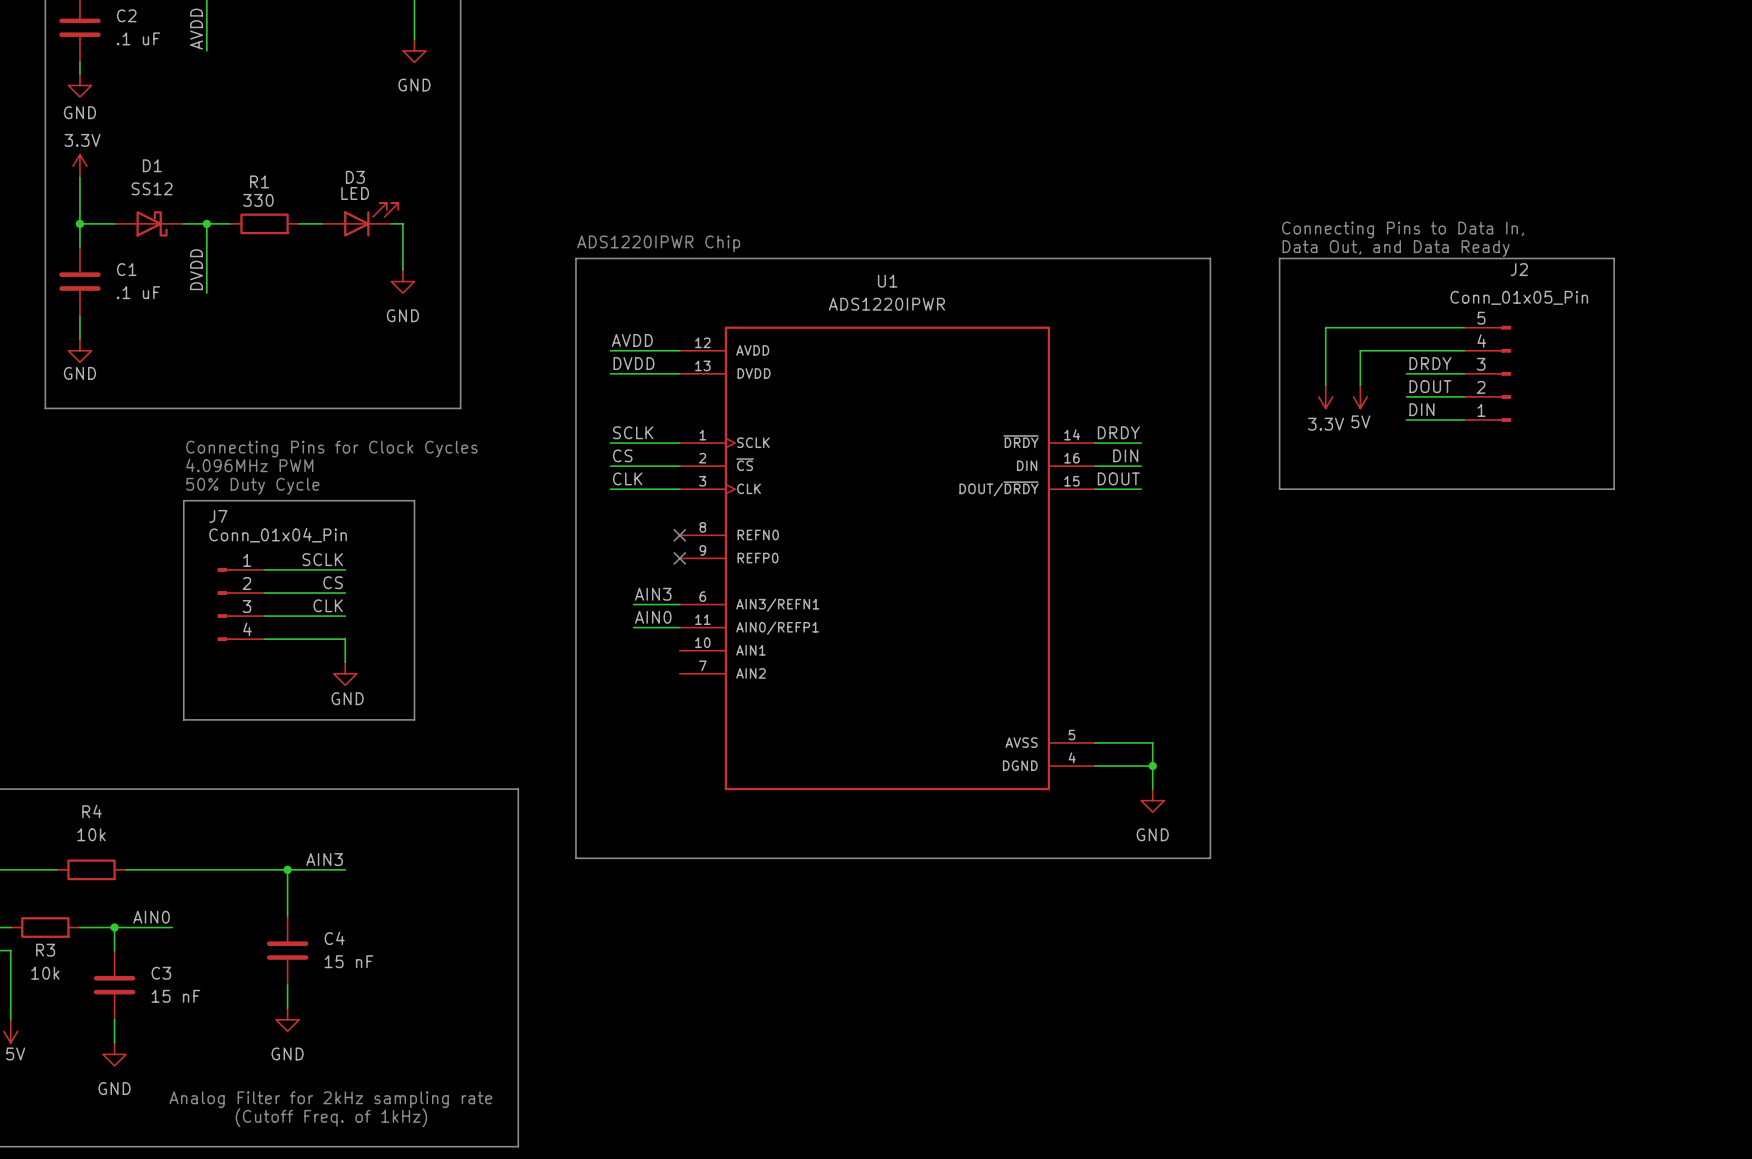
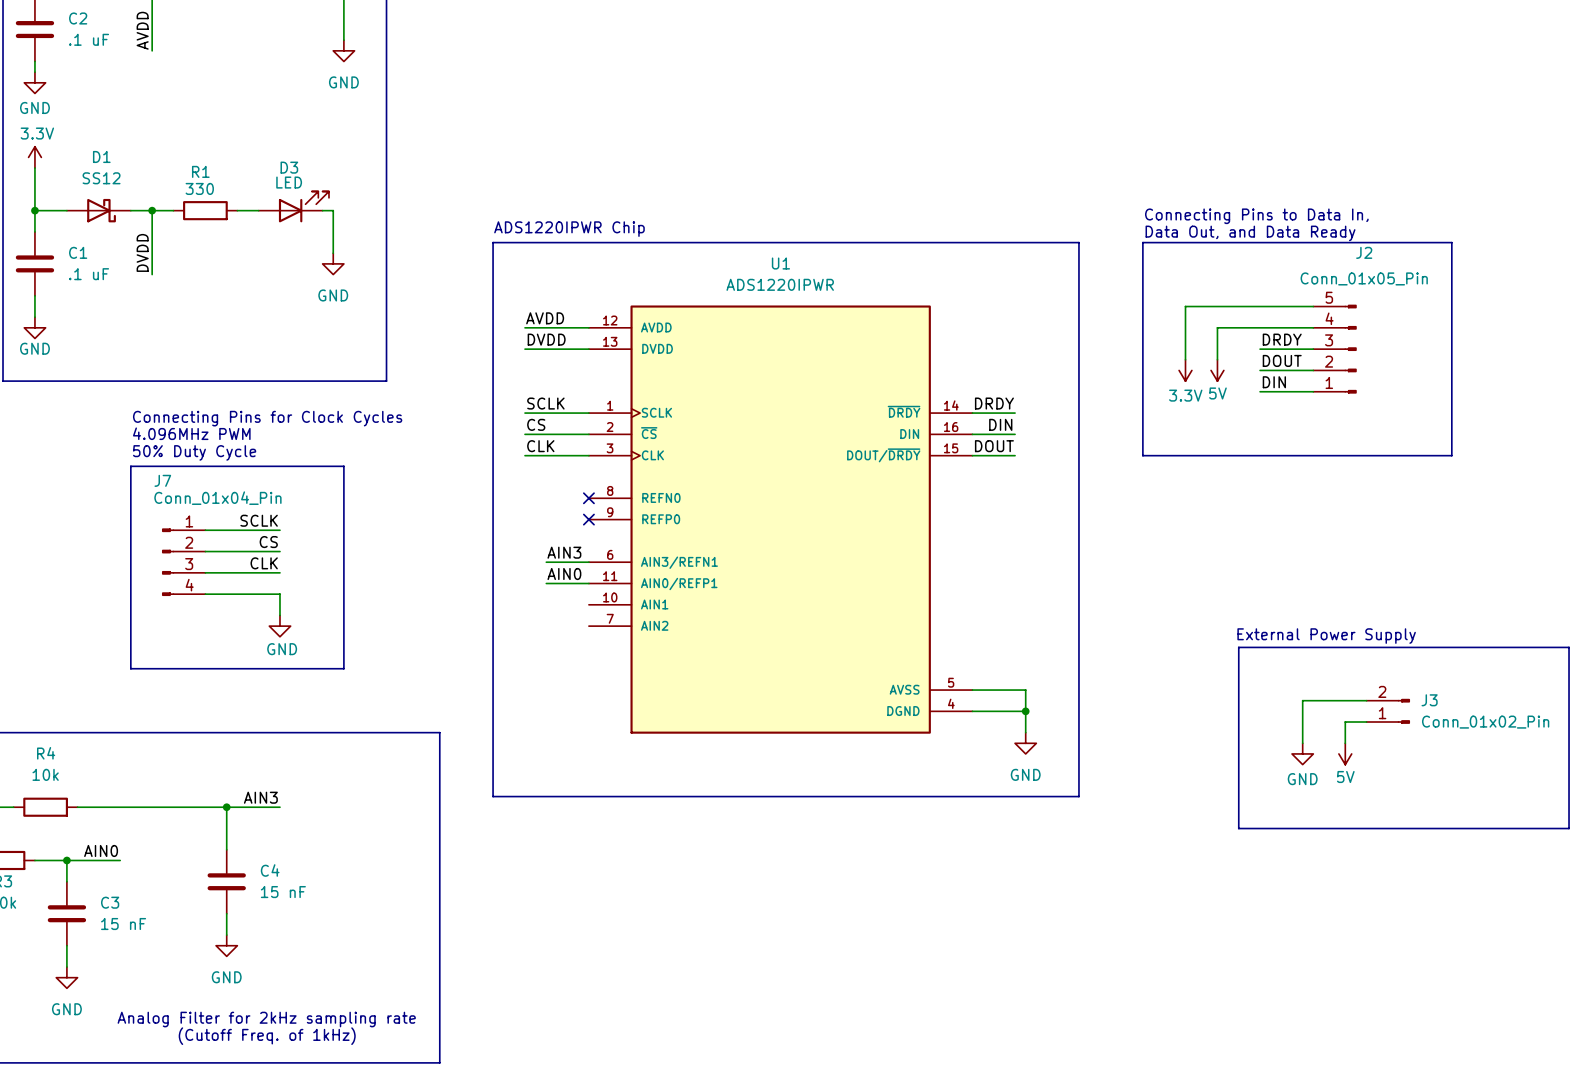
text: none -> External Power Supply (1326, 636)
line: none -> (1238, 647) (1569, 647) (1569, 828) (1238, 828) (1238, 647)
wire: none -> (1366, 700) (1302, 700) (1302, 743)
J3: none -> Conn_01x02_Pin (1388, 711)
wire: none -> (1366, 722) (1345, 722) (1345, 743)
power symbol: none -> GND (1302, 753)
power symbol: none -> 5V (1345, 753)

